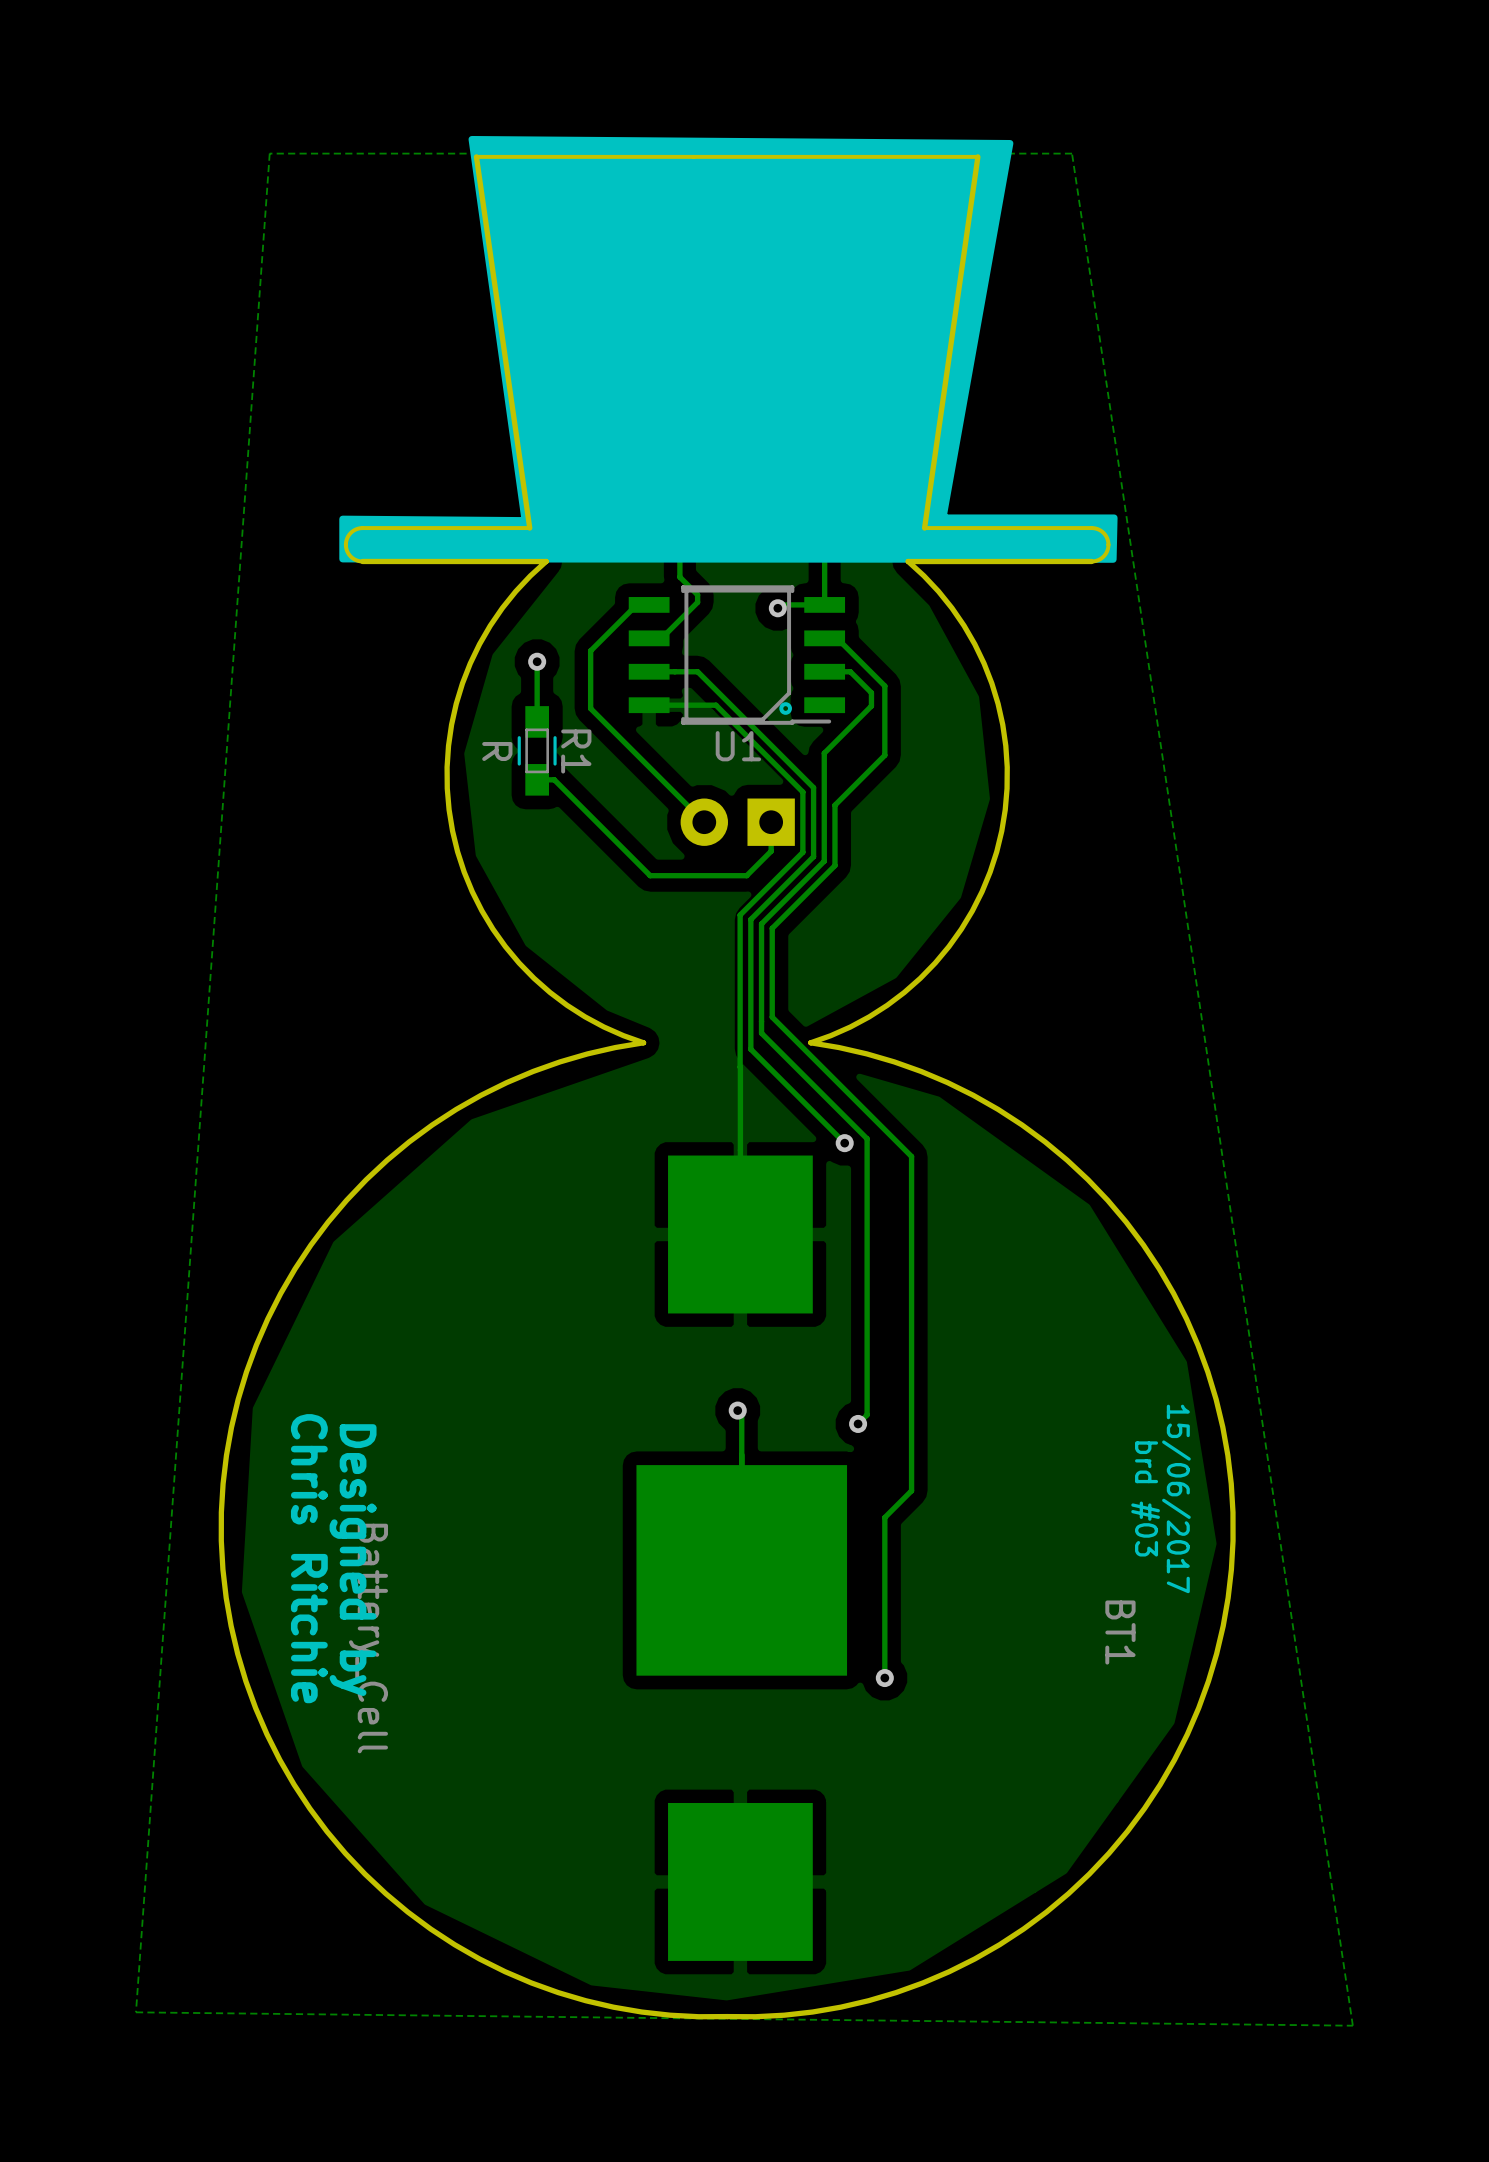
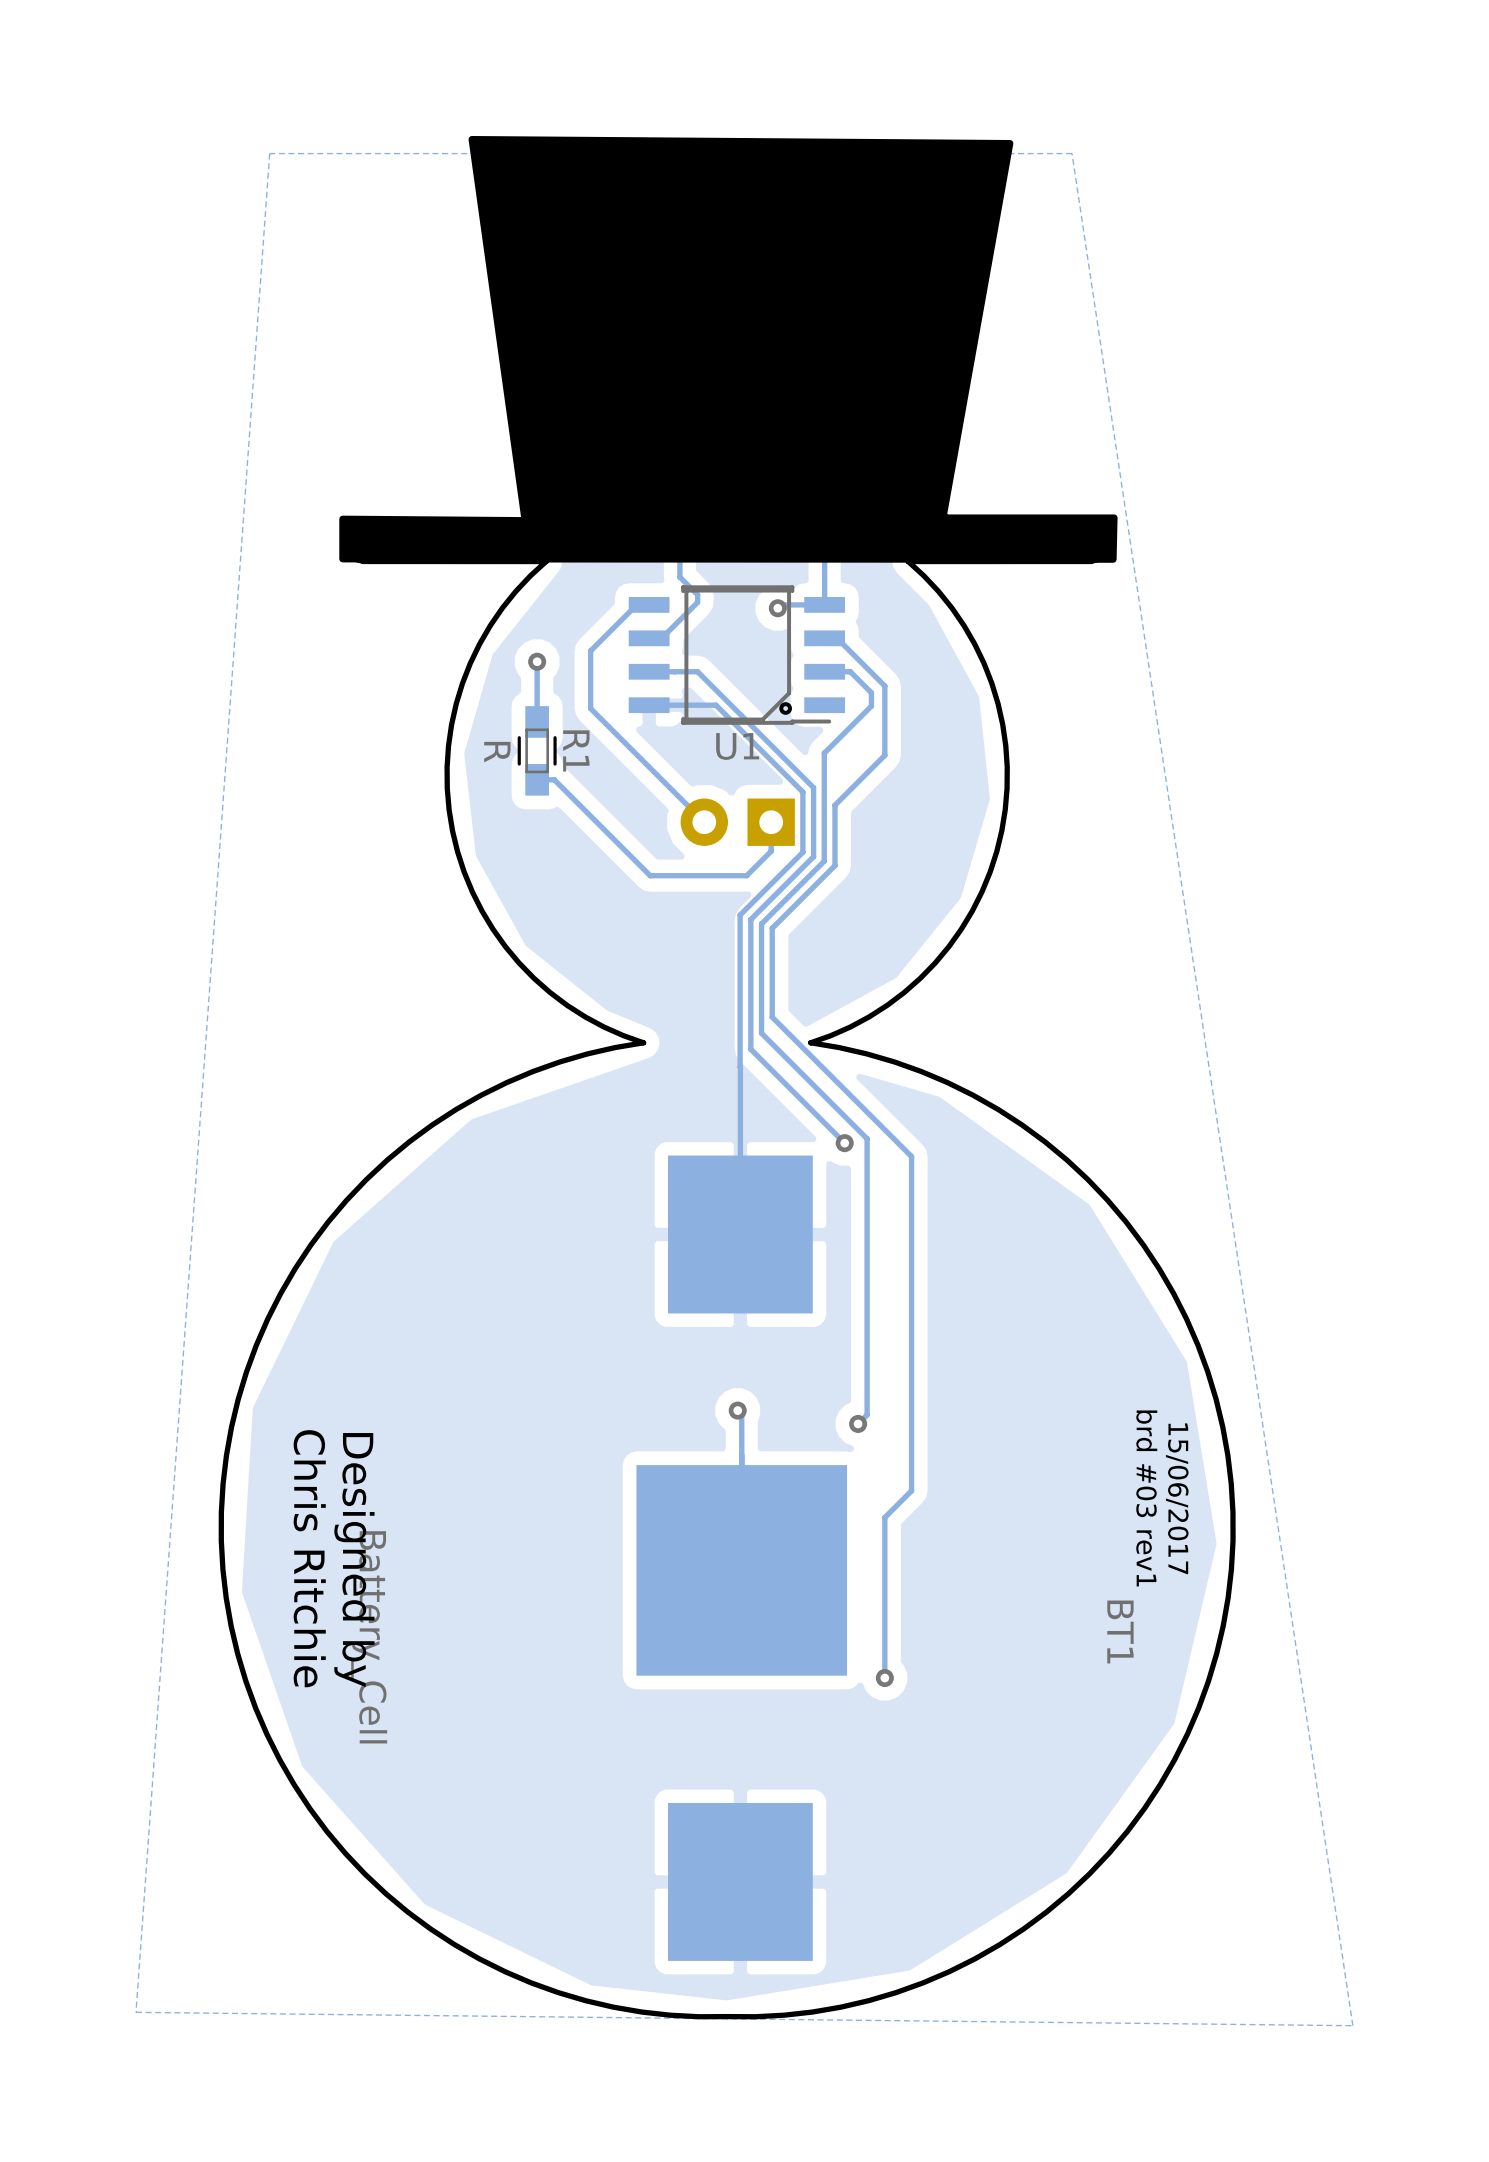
text: brd #03 (1145, 1498) -> brd #03 rev1 (1146, 1498)

